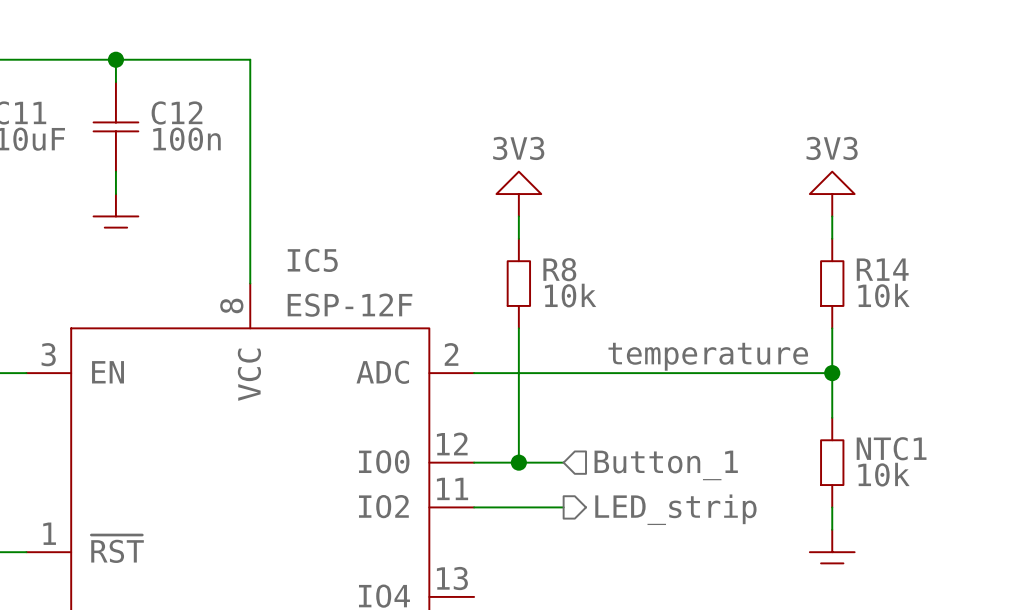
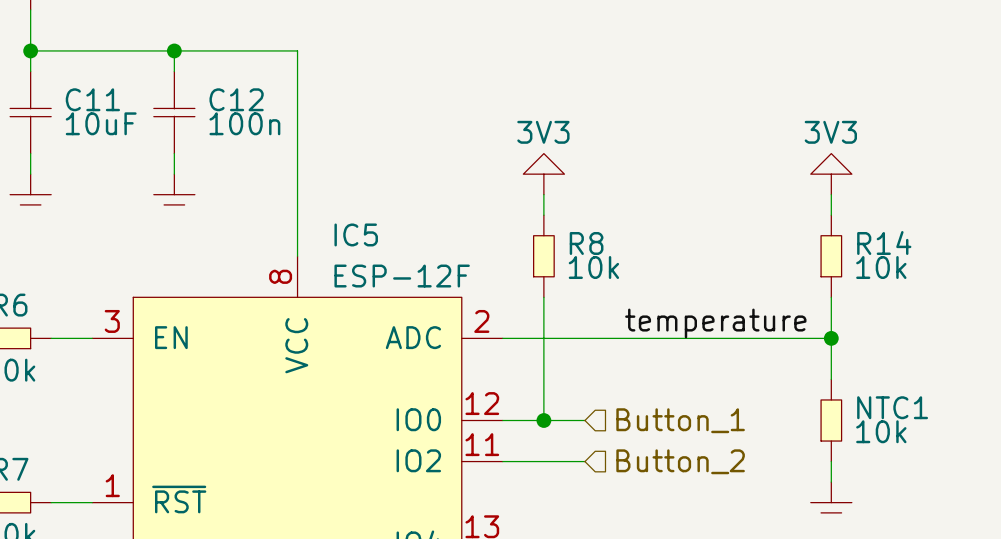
hierarchical label shape: output (675, 509) -> input (680, 461)
hierarchical label: LED_strip (675, 509) -> Button_2 (680, 461)

